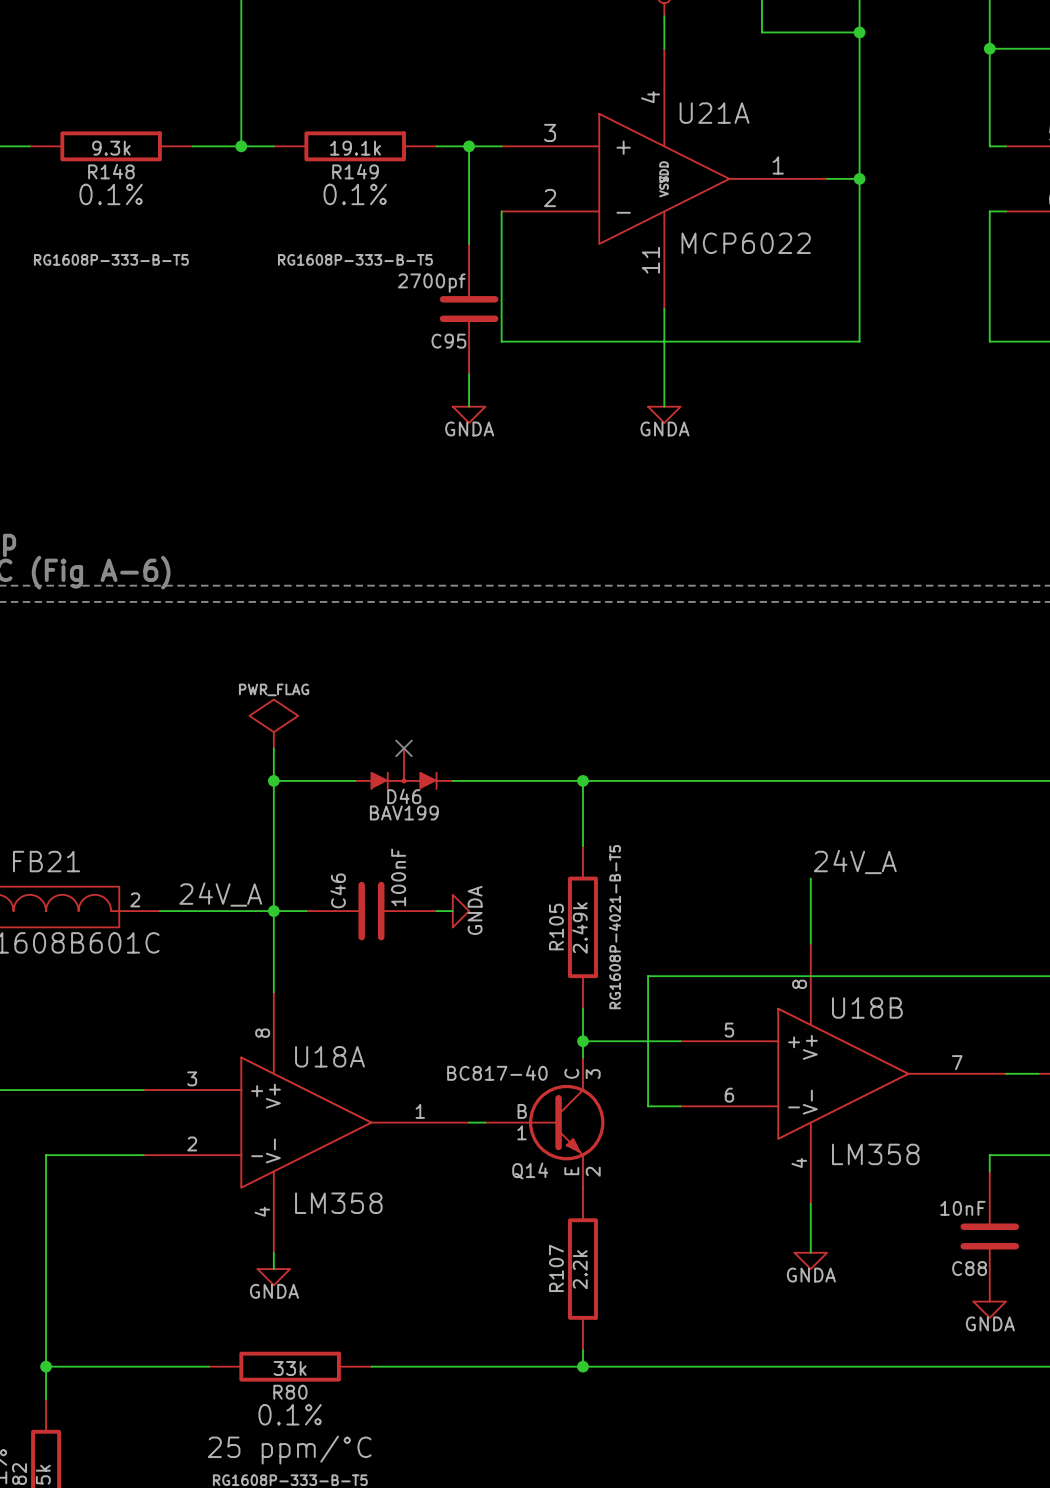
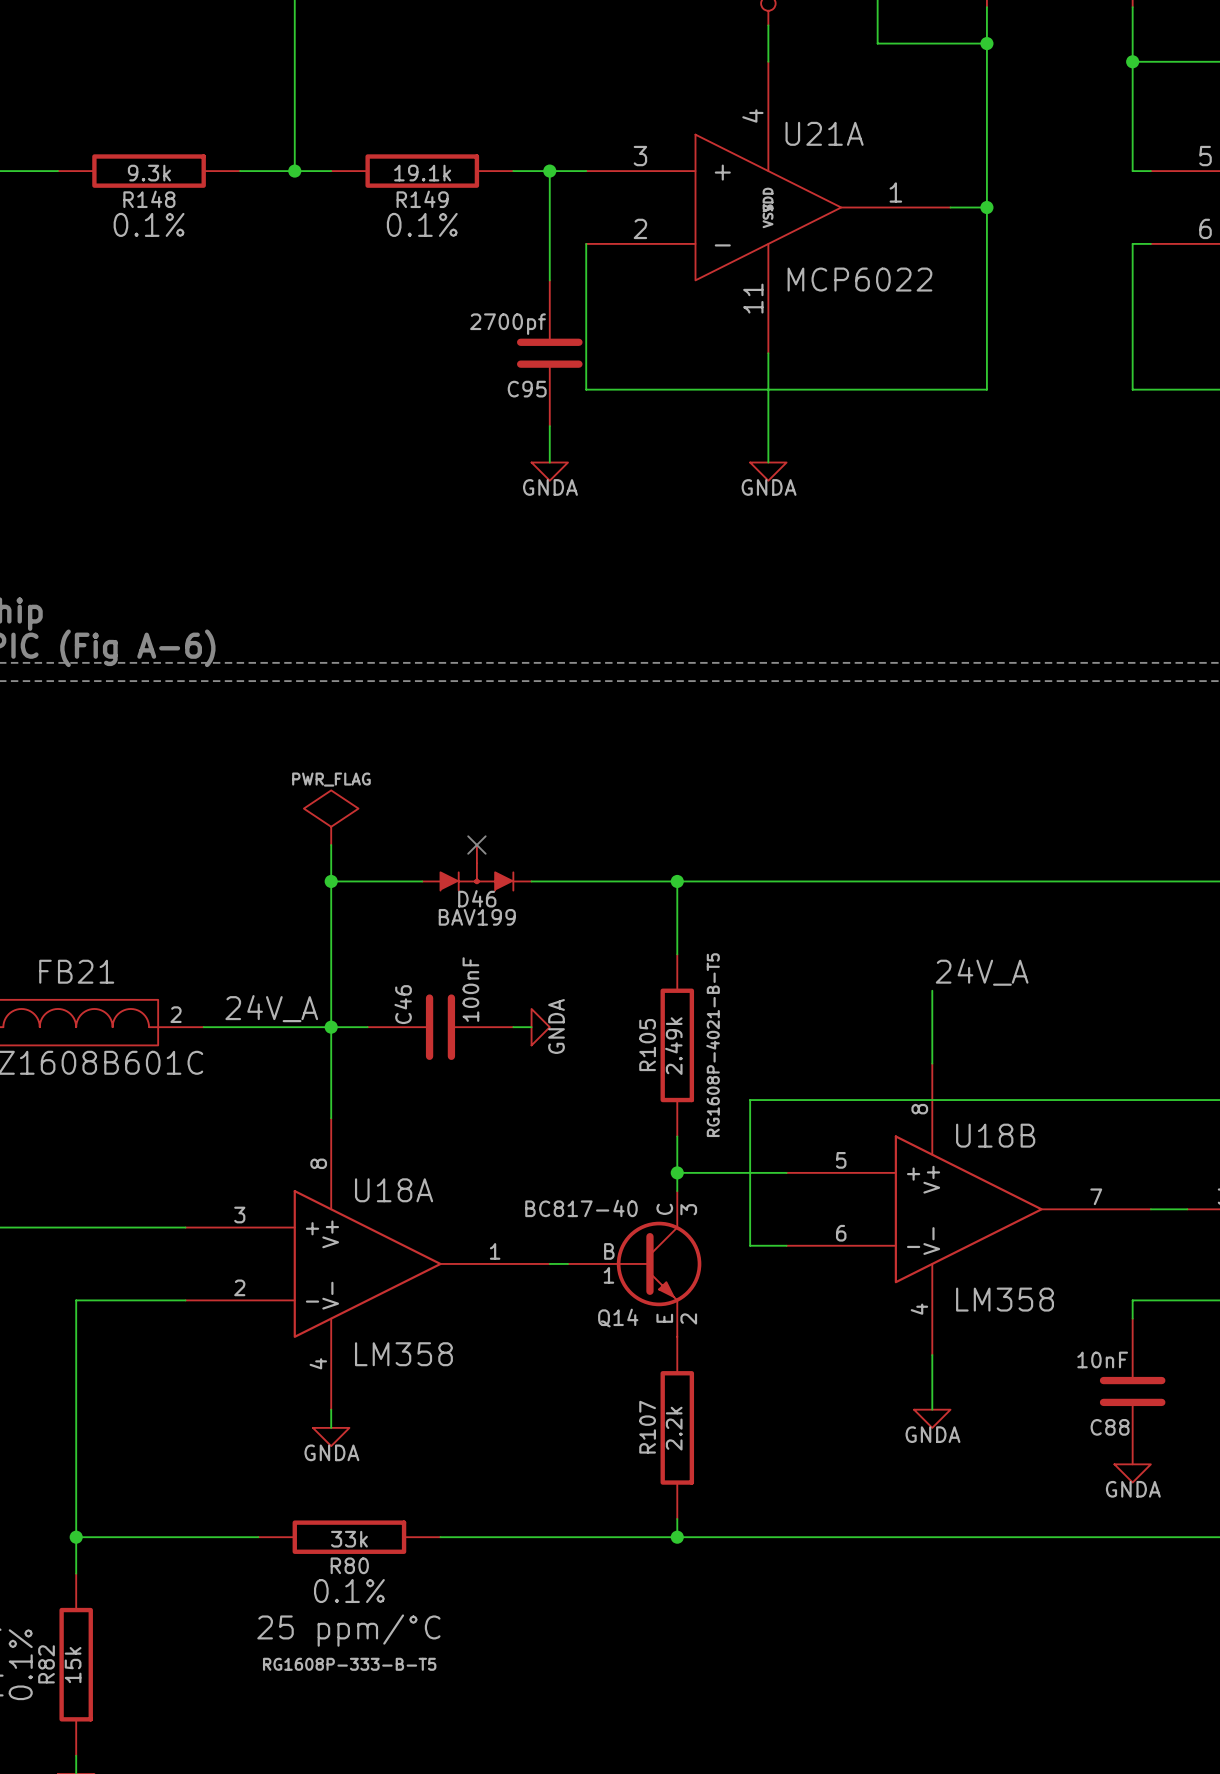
R148 text: RG1608P-333-B-T5 (111, 259) -> none
R149 text: RG1608P-333-B-T5 (355, 259) -> none

